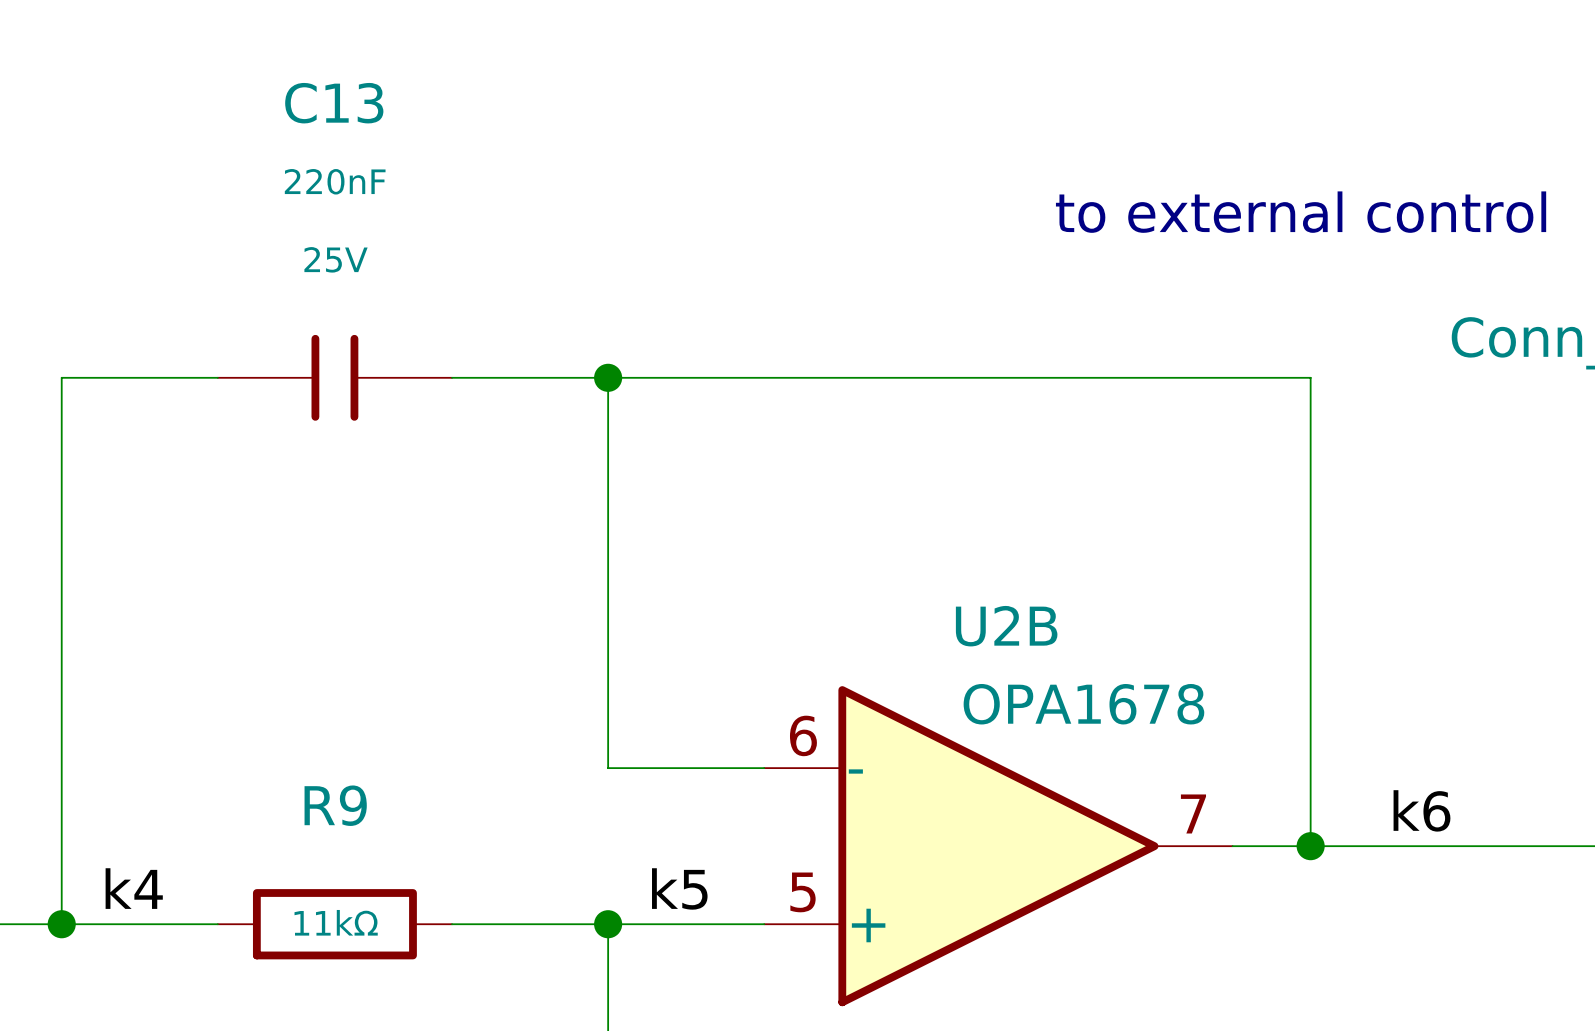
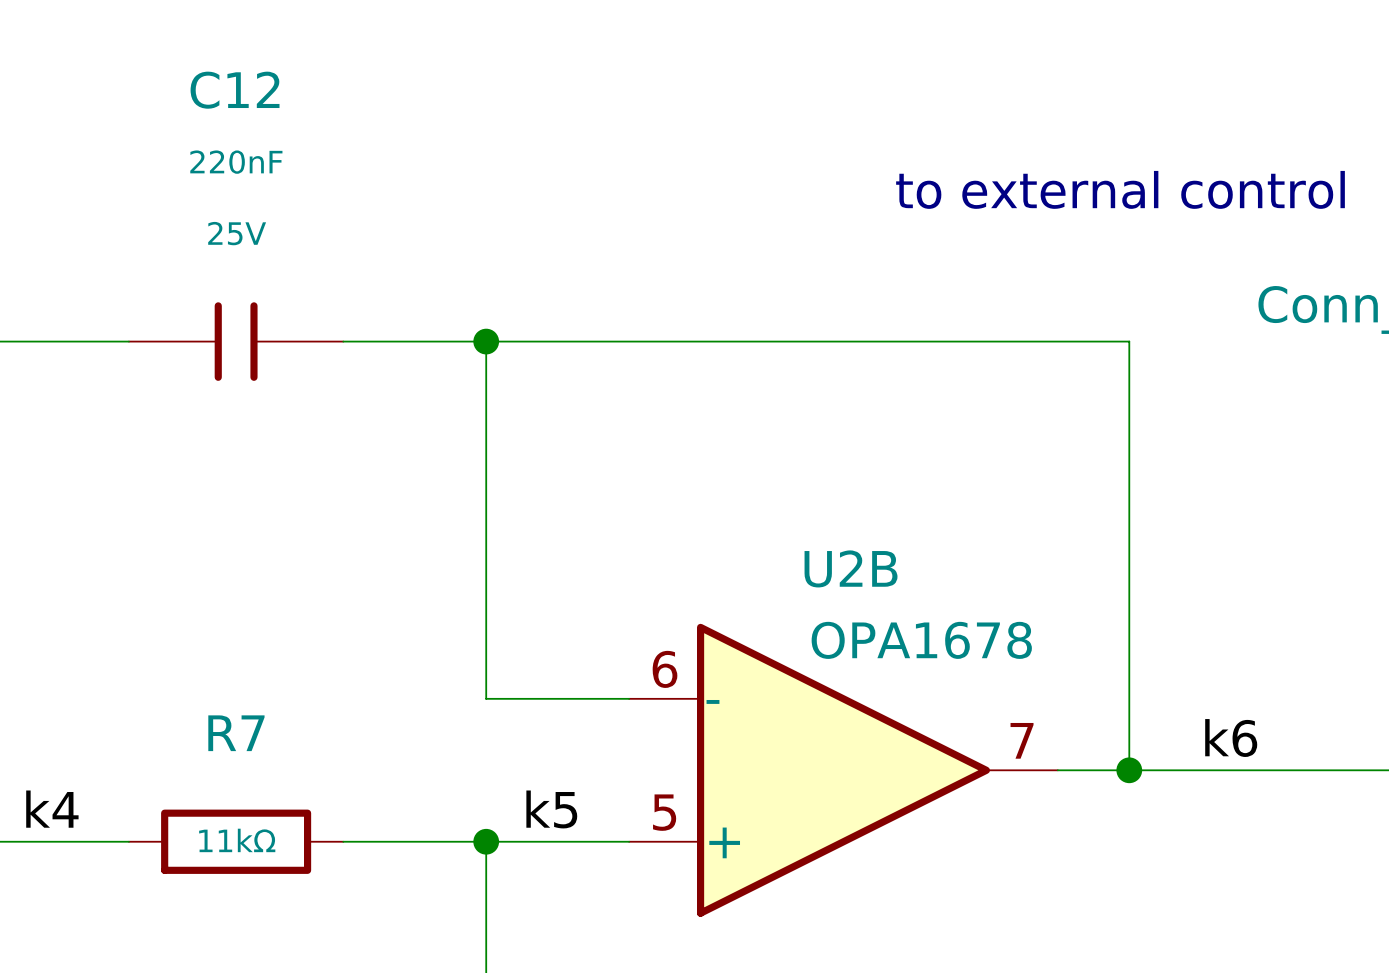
C13 name: C13 (334, 103) -> C12 (235, 90)
R9 name: R9 (335, 805) -> R7 (236, 733)

